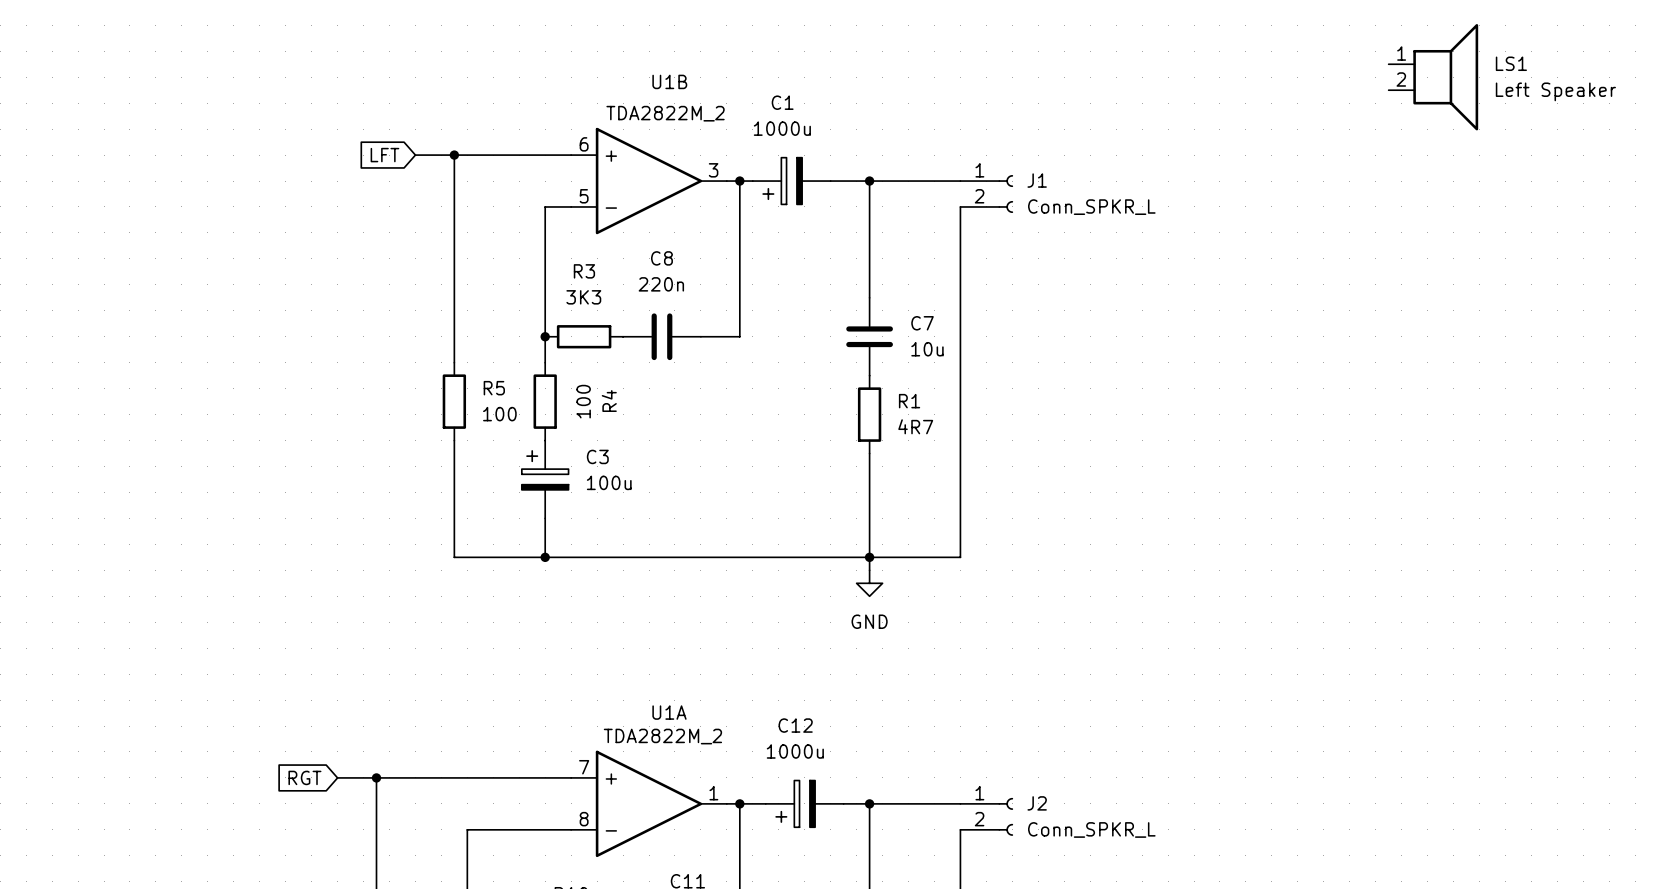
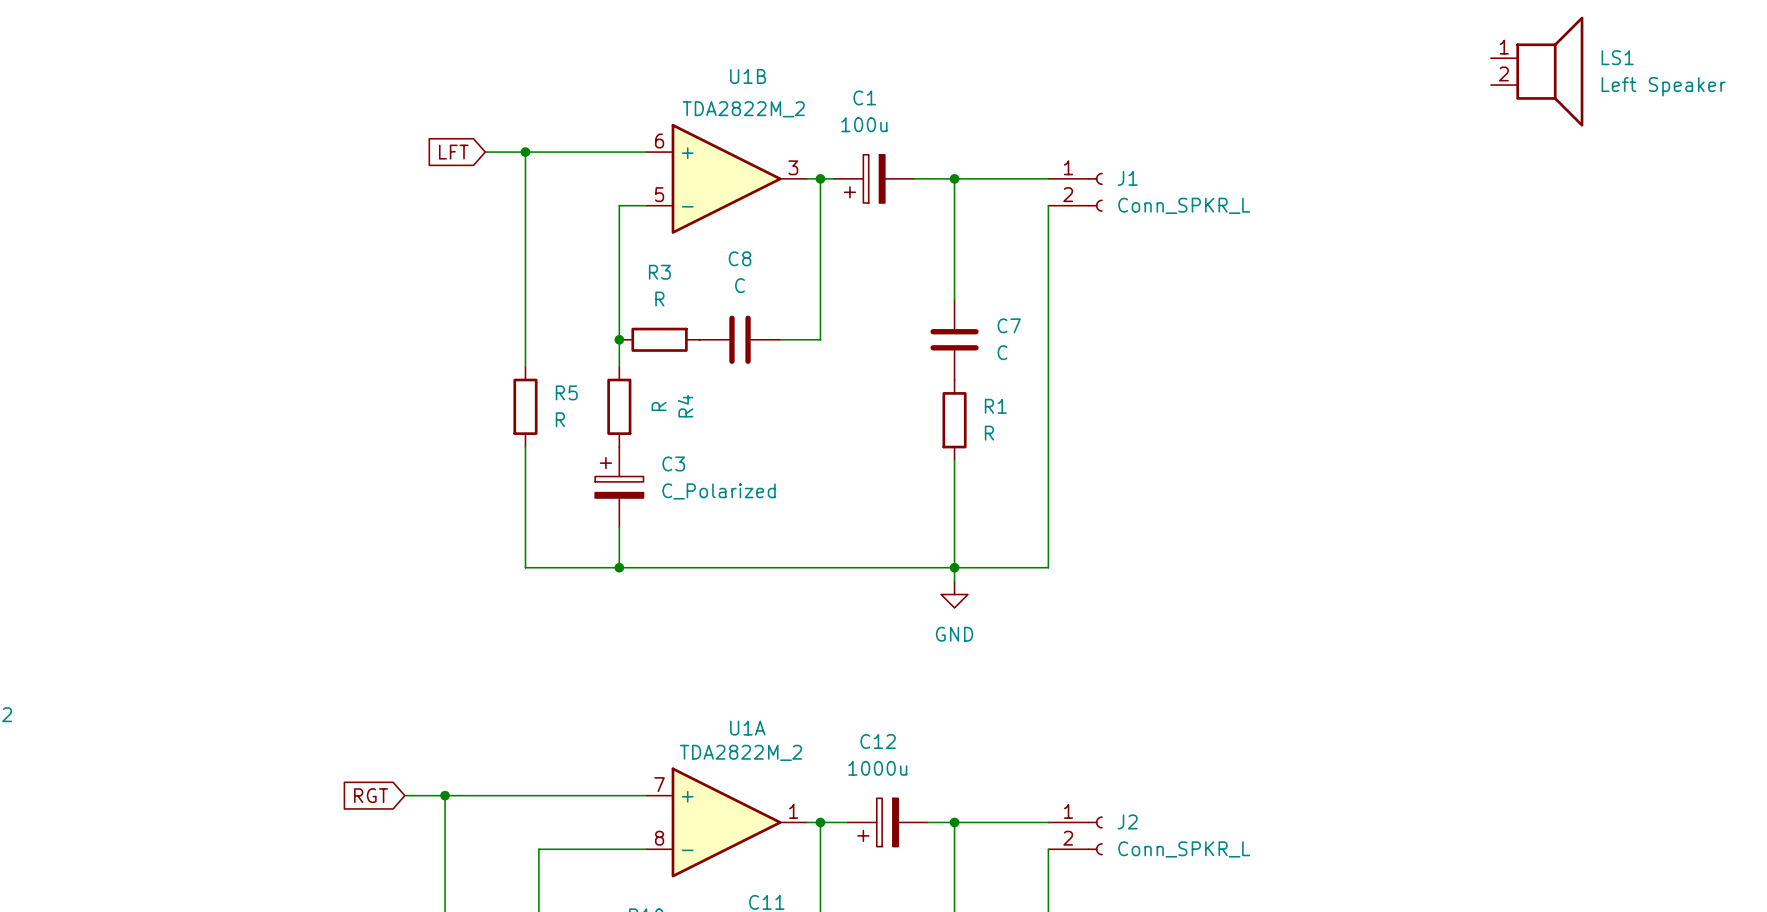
C1 value: 1000u (782, 128) -> 100u (864, 124)
C8 value: 220n (661, 284) -> C (740, 285)
R3 value: 3K3 (583, 297) -> R (659, 299)
C7 value: 10u (927, 349) -> C (1002, 352)
R4 value: 100 (583, 401) -> R (659, 406)
R5 value: 100 (499, 414) -> R (560, 419)
R1 value: 4R7 (915, 426) -> R (989, 433)
C3 value: 100u (609, 482) -> C_Polarized (719, 491)

